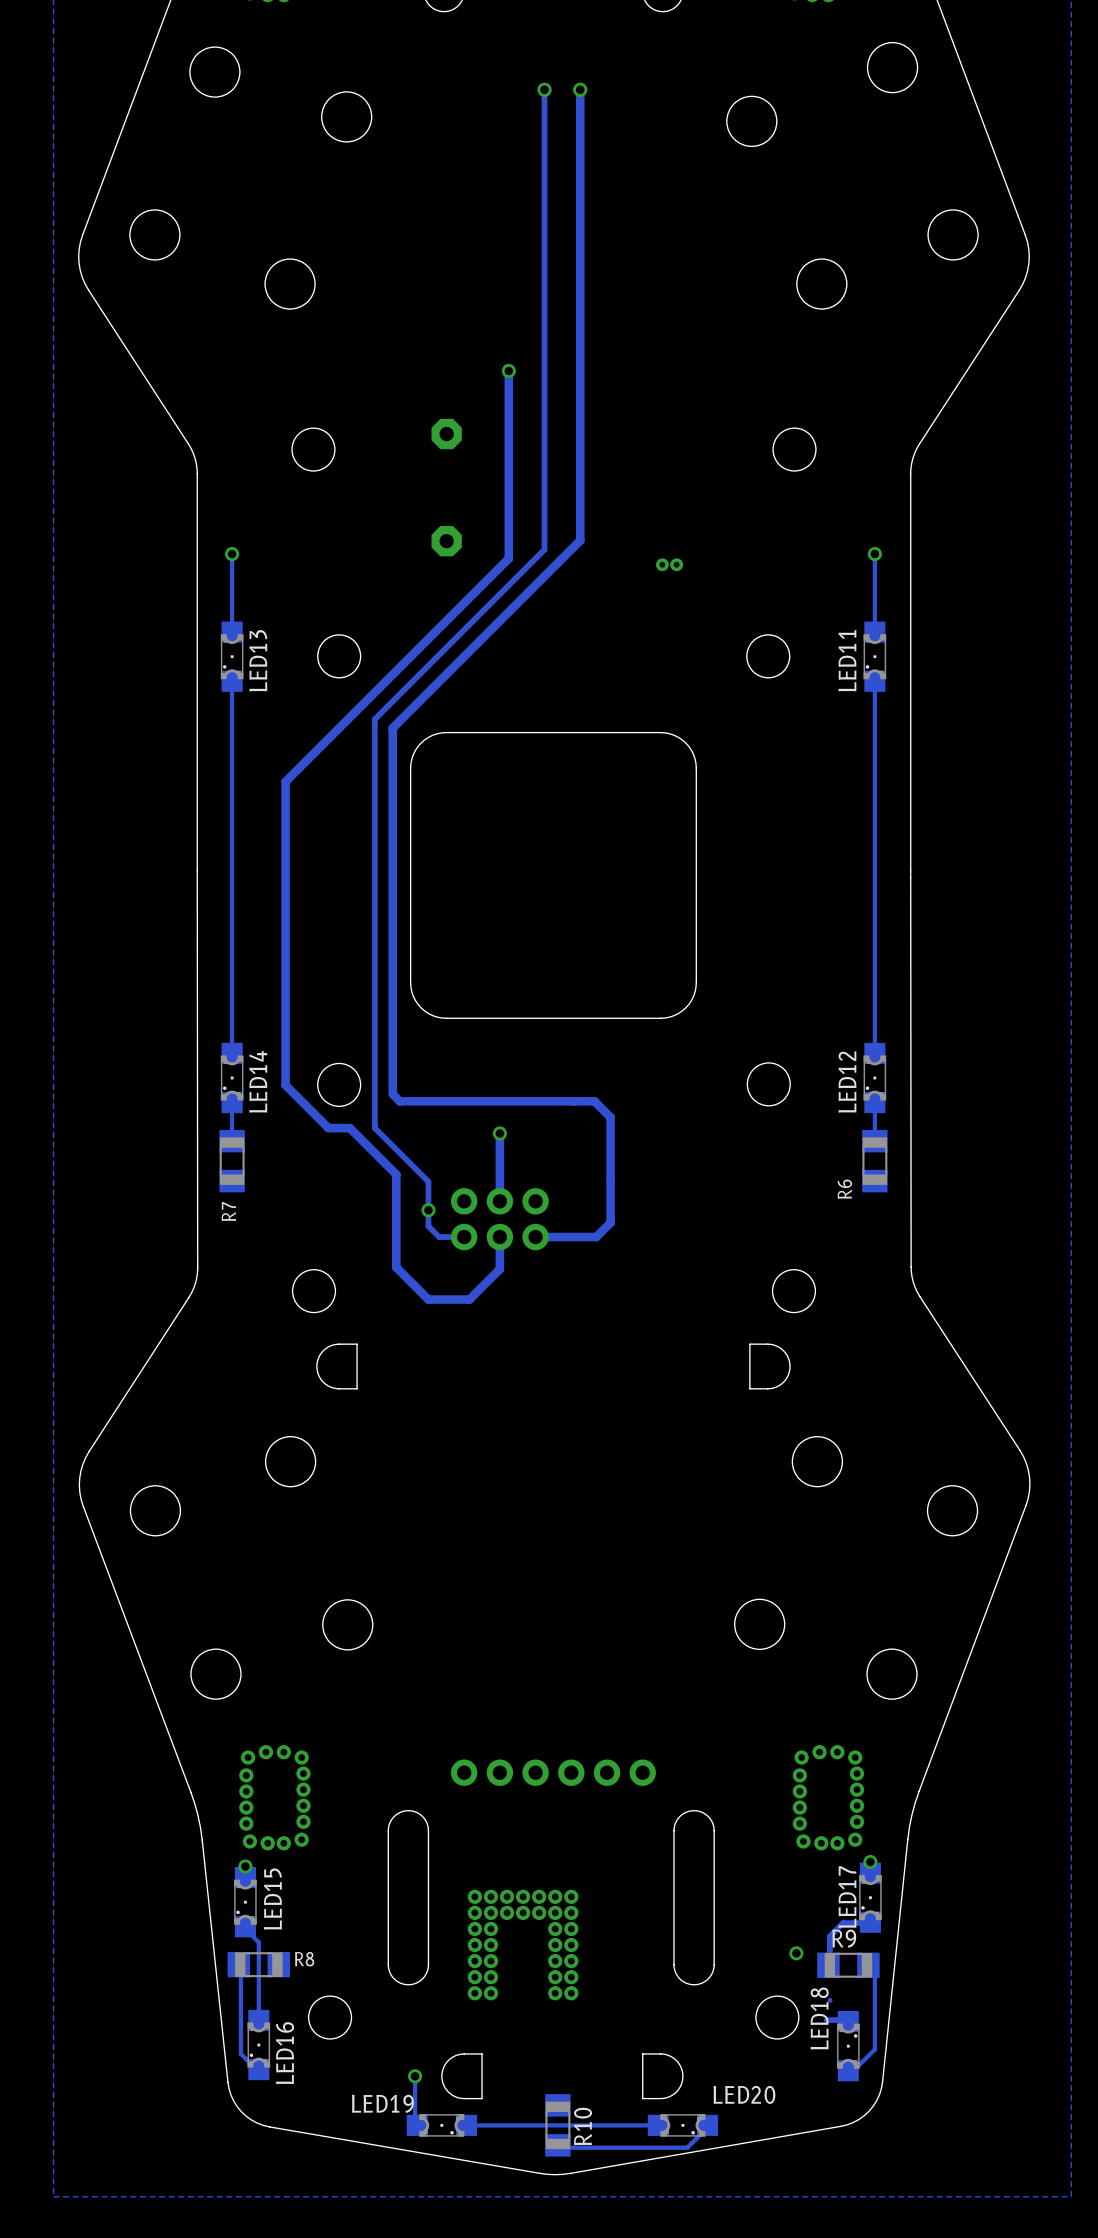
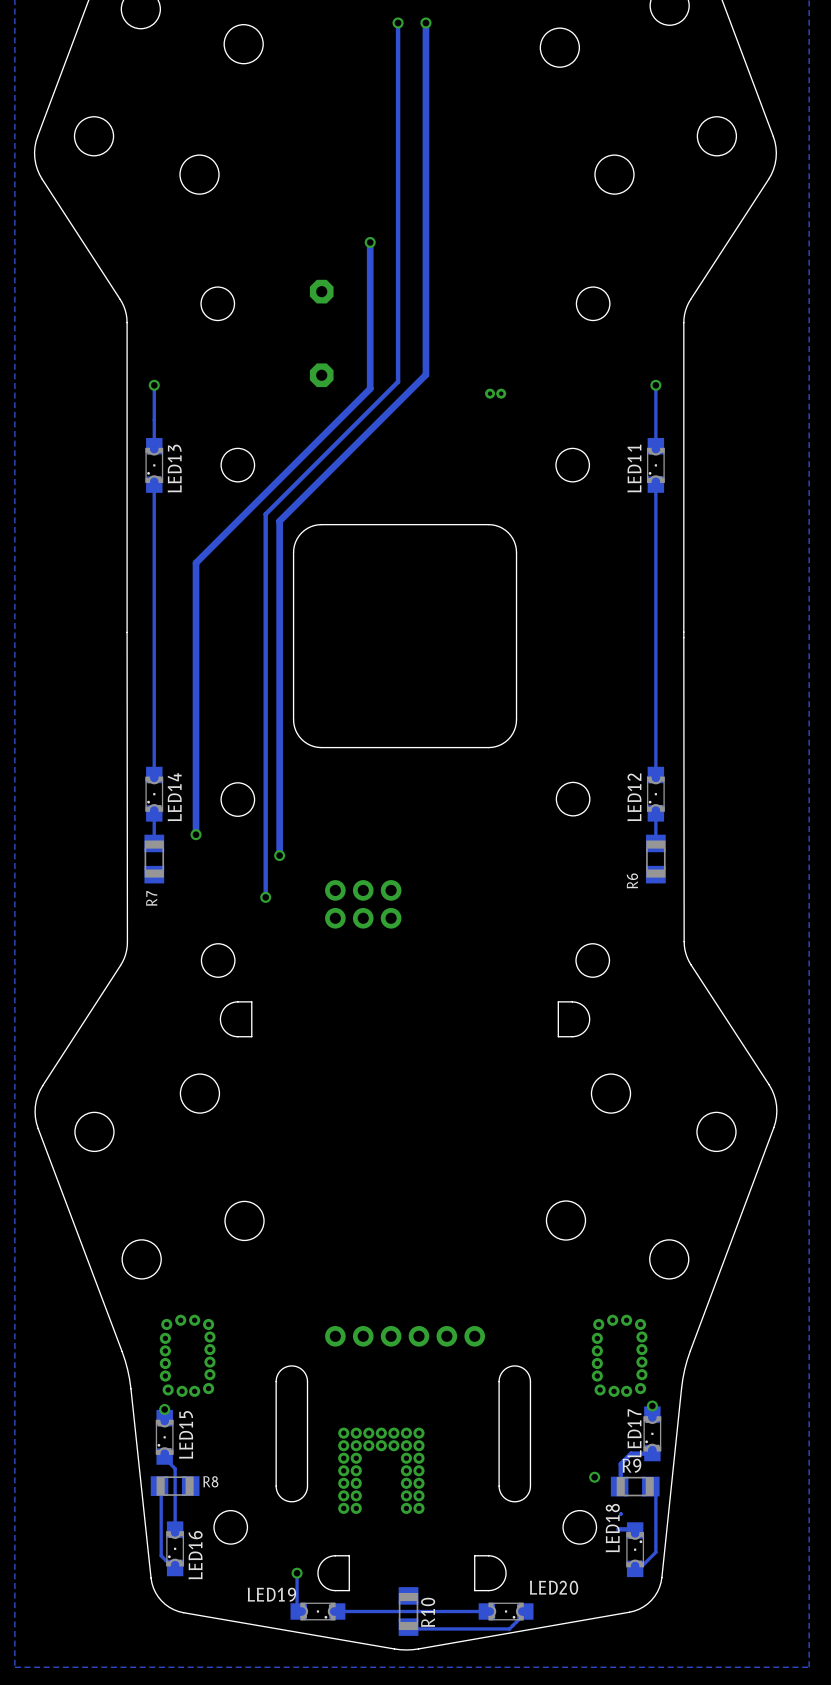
track: (285, 1085) (328, 1128) (349, 1128) (396, 1174) (396, 1267) (428, 1299) (469, 1299) (499, 1269) (499, 1237) -> (196, 799) (196, 834)
track: none -> (279, 805) (279, 855)
track: (392, 1094) (399, 1101) (594, 1101) (610, 1117) (610, 1181) -> none
track: (374, 1128) (428, 1181) (428, 1226) (439, 1237) (464, 1237) -> (265, 833) (265, 897)
via: none -> (196, 834)
track: (499, 1133) (499, 1201) -> none
via: (499, 1133) -> none
via: none -> (279, 855)
track: (610, 1183) (610, 1222) (596, 1237) (535, 1237) -> none
via: none -> (265, 897)
via: (428, 1210) -> none

